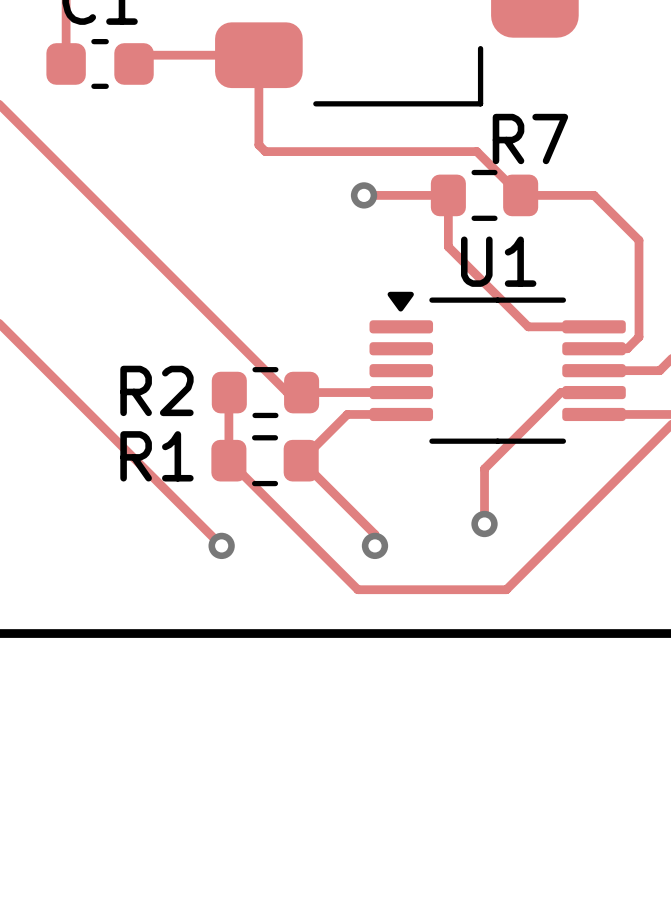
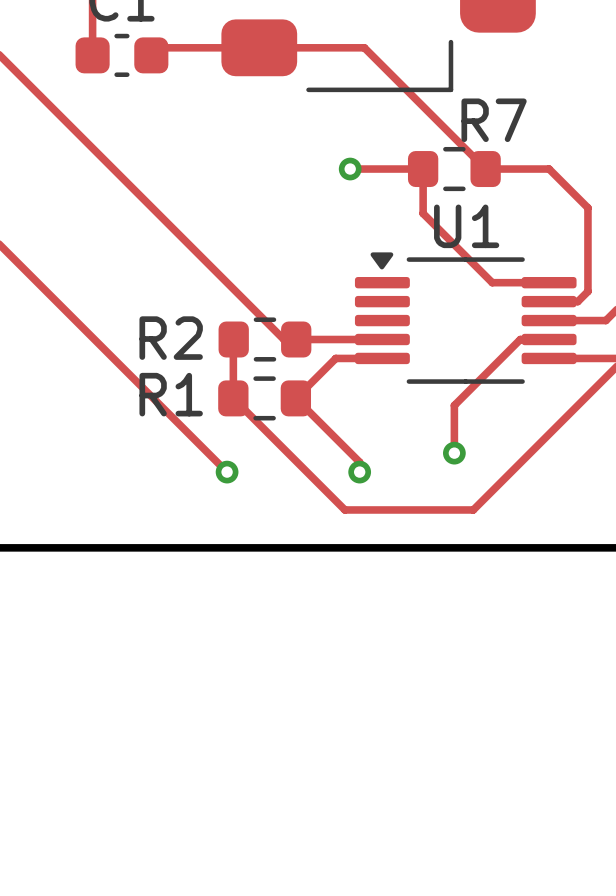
track: (258, 55) (258, 145) (265, 151) (476, 151) -> (259, 47) (364, 47) (447, 131)

